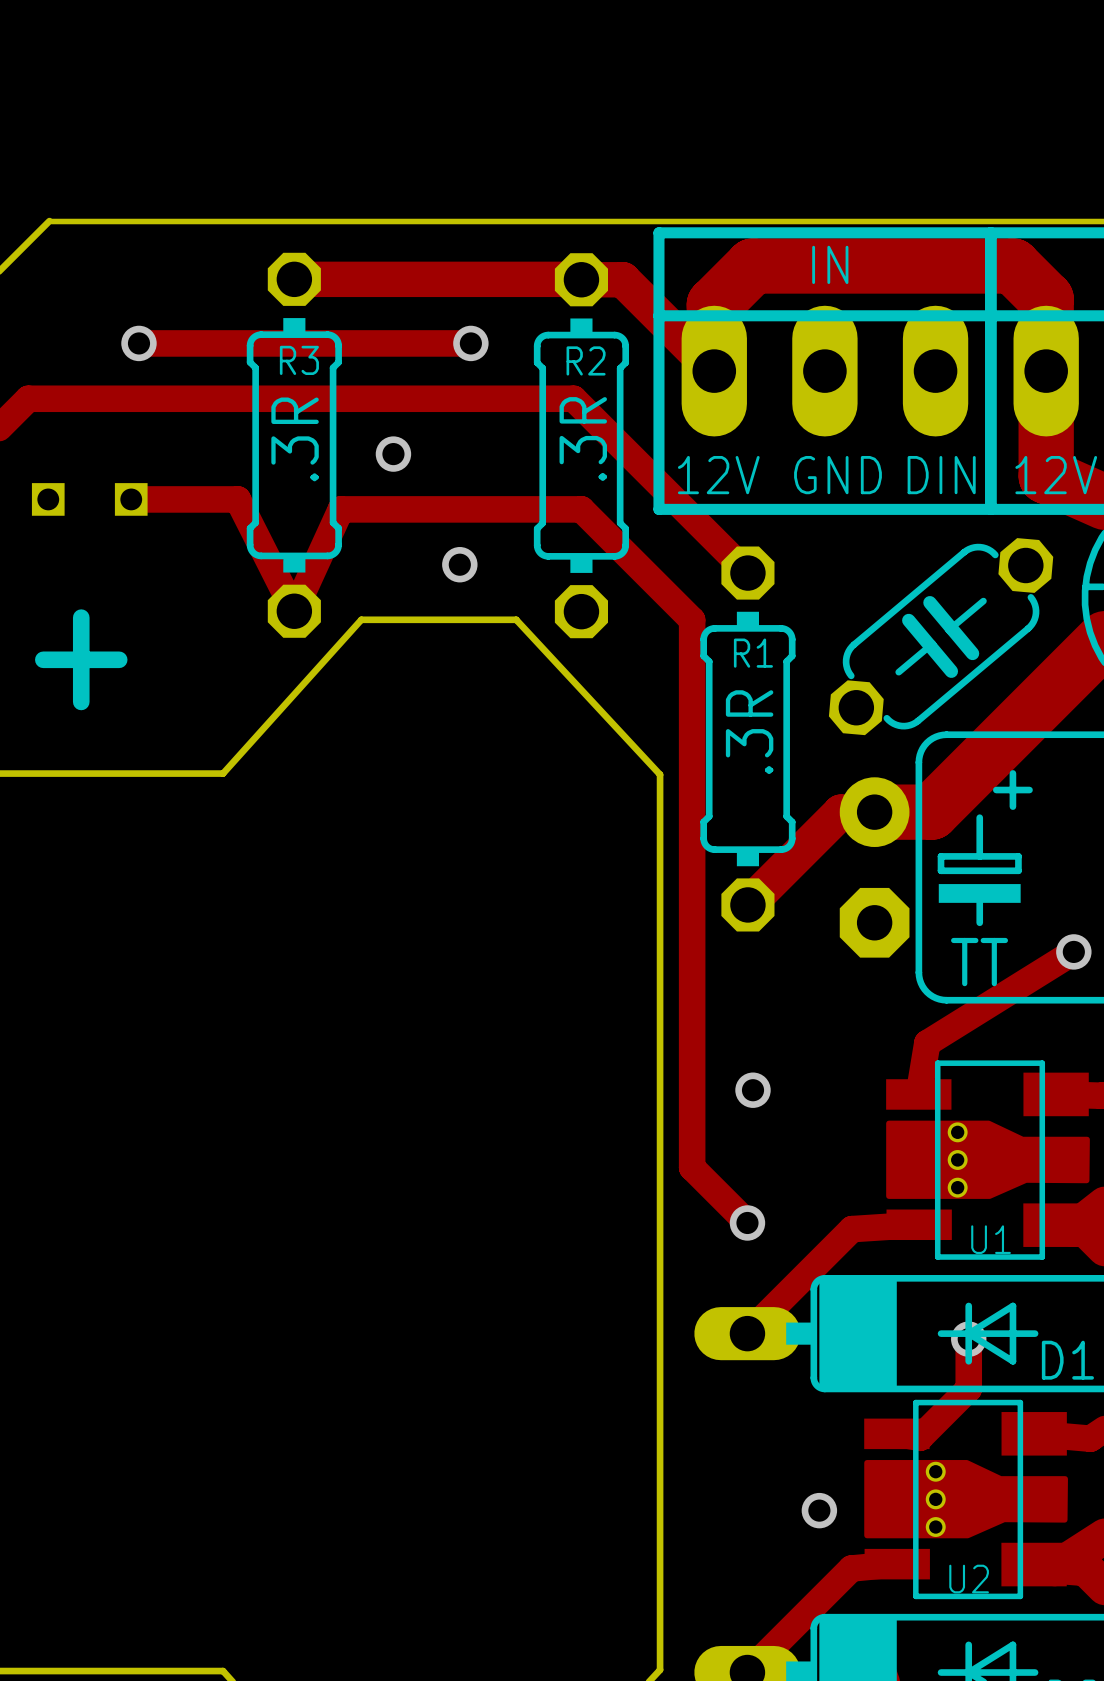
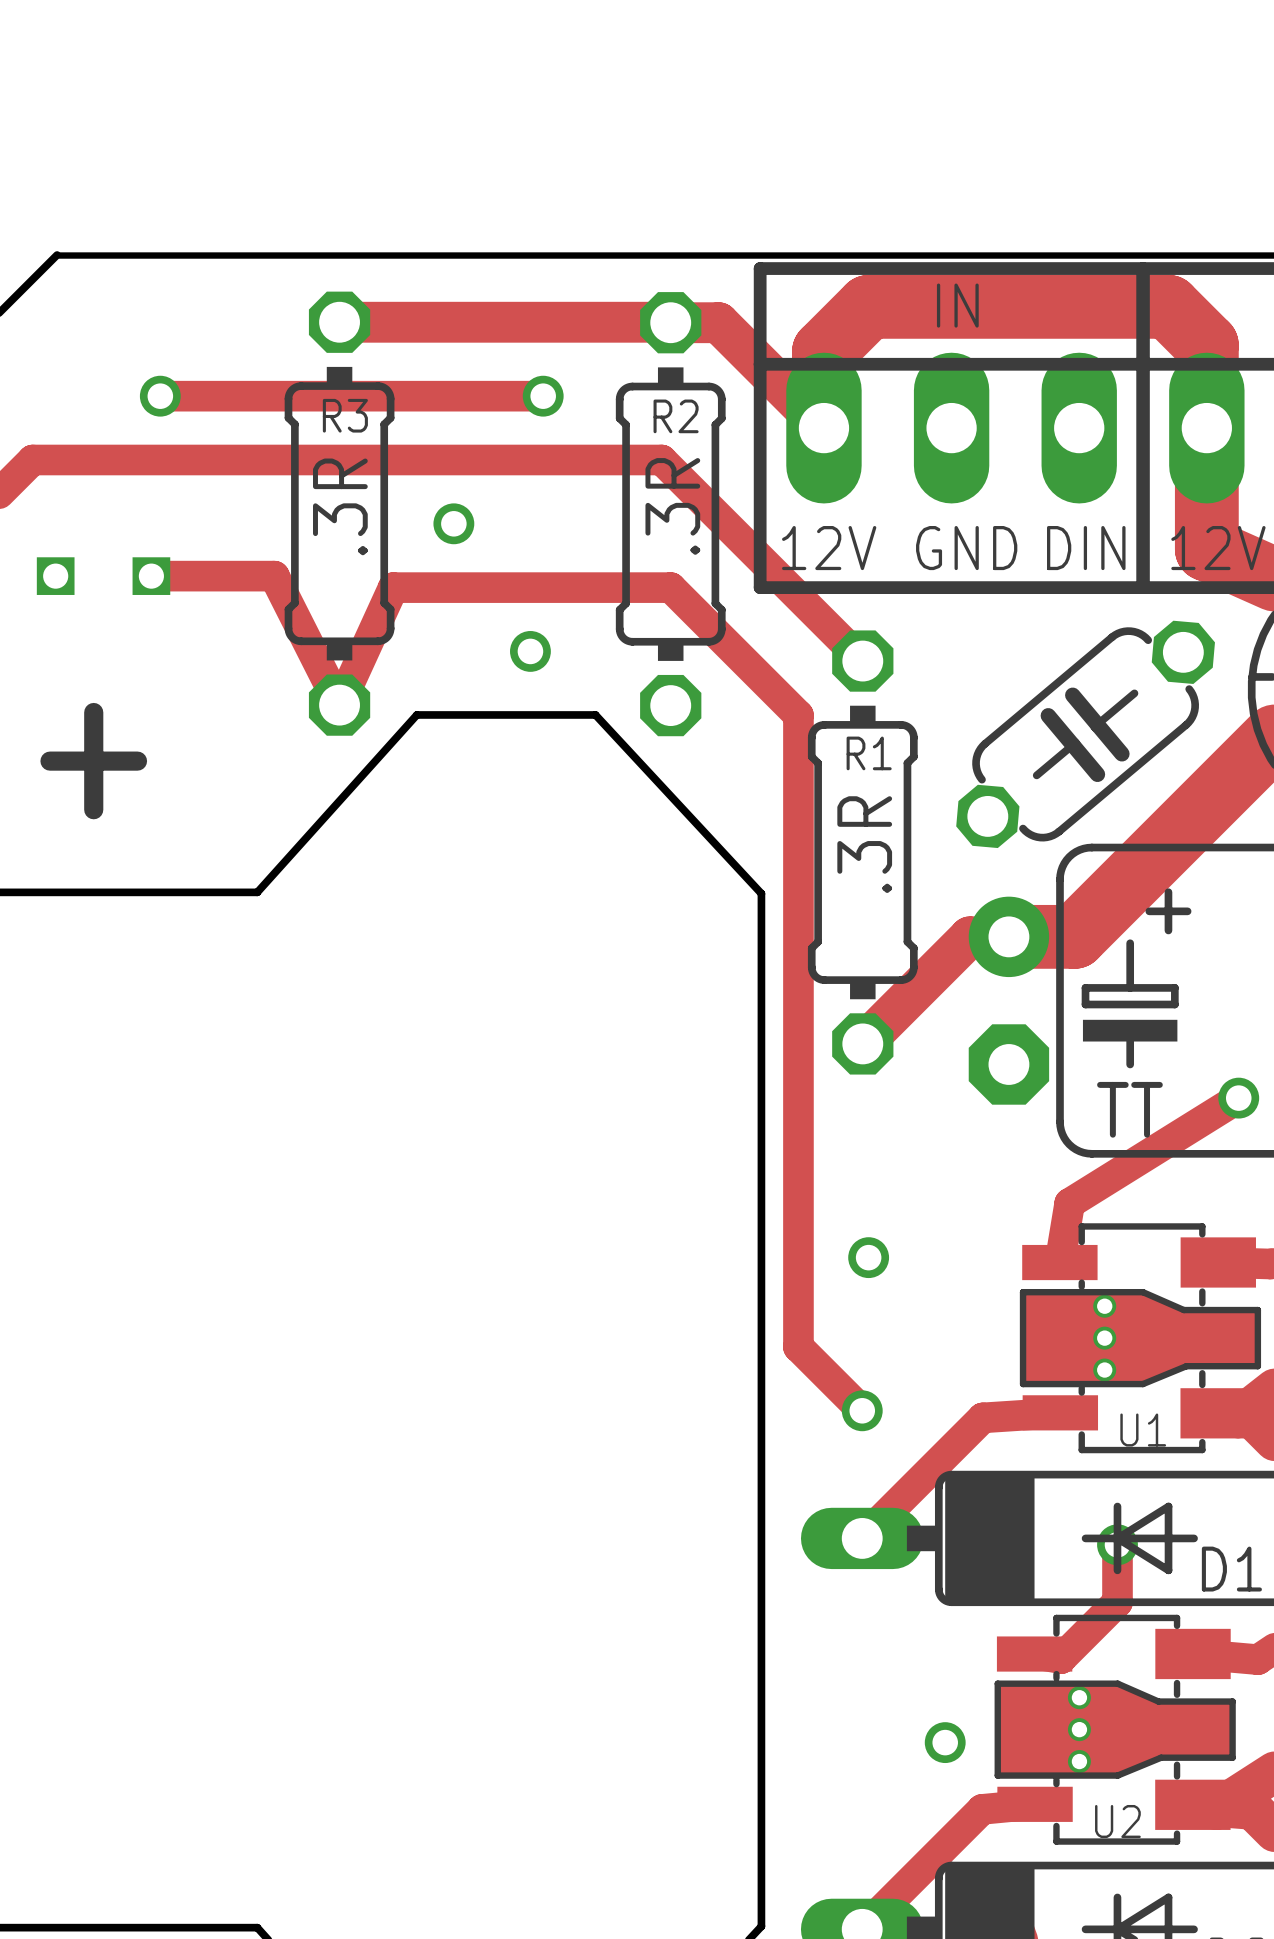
U1 footprint: [886, 1060, 1090, 1260] -> [1019, 1223, 1262, 1454]
U2 footprint: [864, 1399, 1068, 1600] -> [994, 1614, 1236, 1845]

